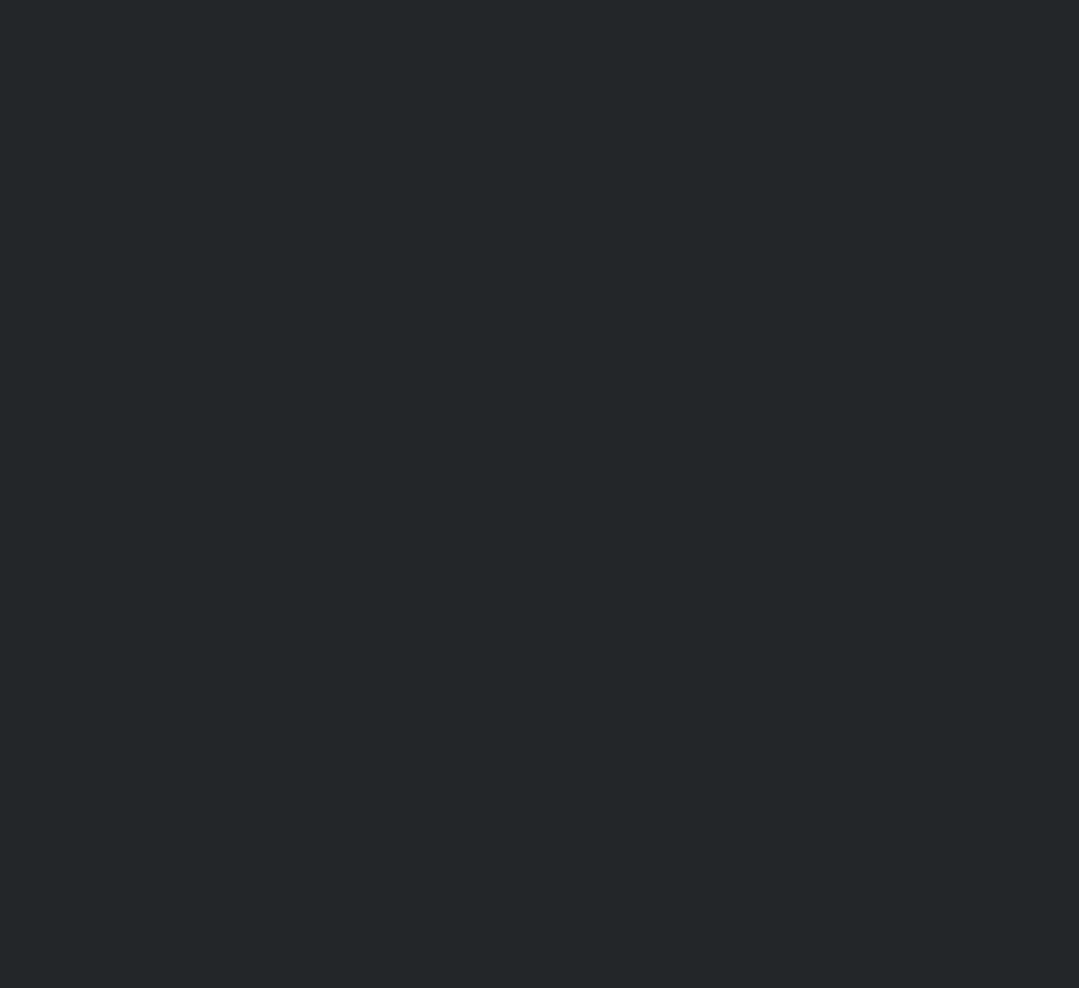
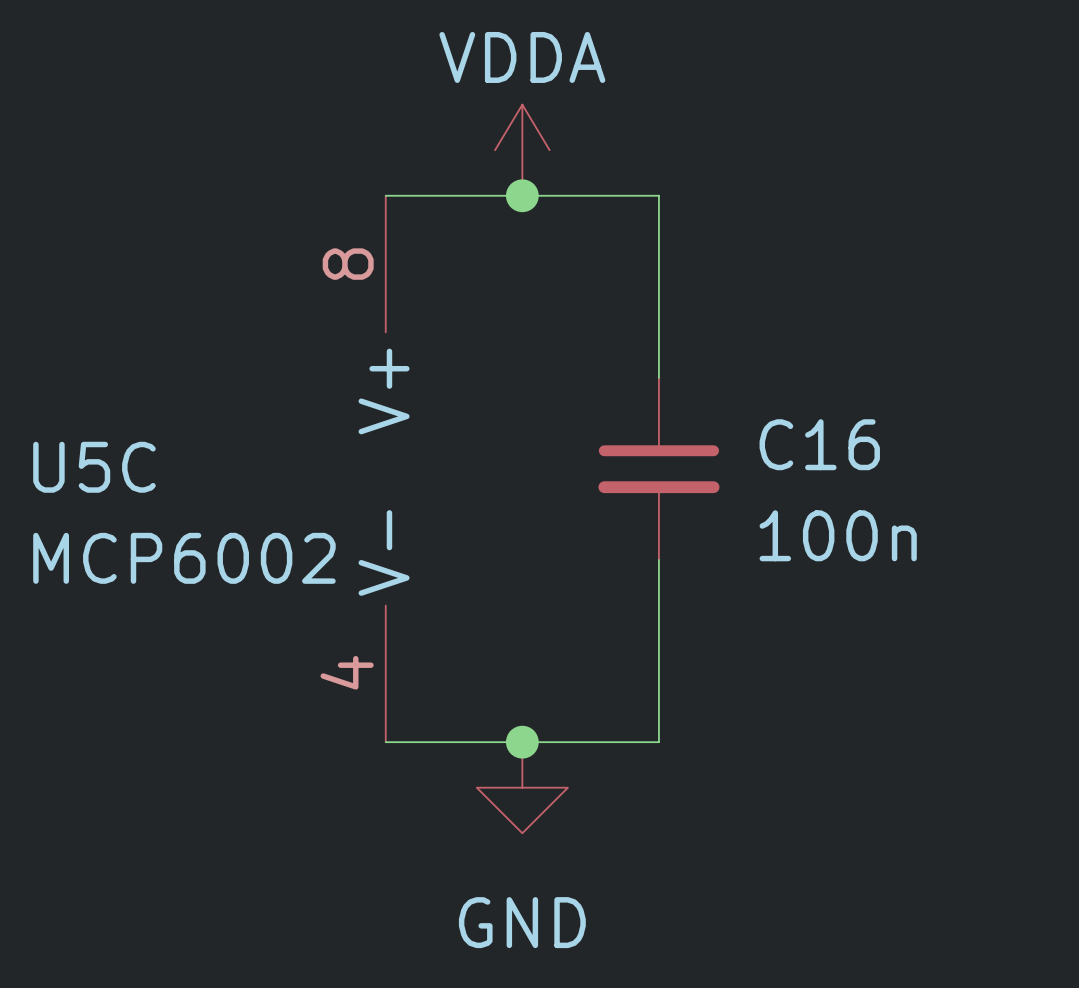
power symbol: none -> VDDA (522, 150)
wire: none -> (385, 195) (658, 195) (658, 377)
junction: none -> (522, 195)
U5C: none -> MCP6002 (385, 468)
C16: none -> 100n (658, 468)
wire: none -> (658, 560) (658, 742) (385, 742)
junction: none -> (522, 742)
power symbol: none -> GND (522, 787)

